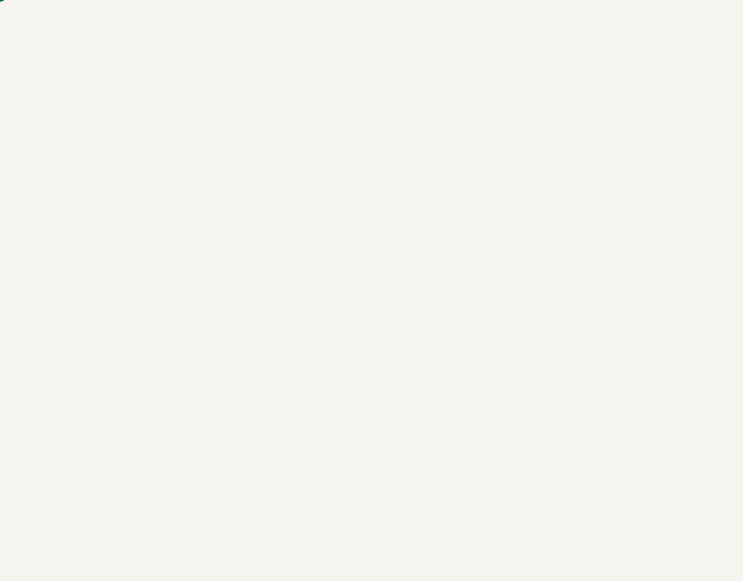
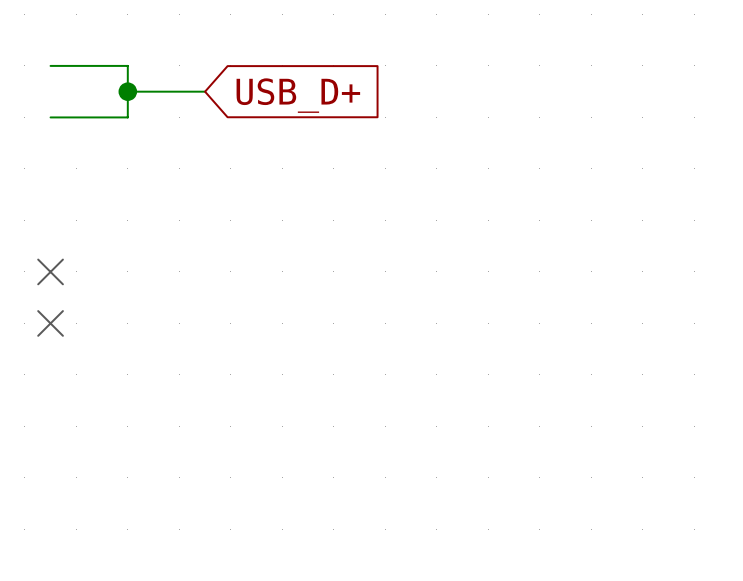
wire: none -> (50, 65) (127, 65) (127, 117) (50, 117)
wire: none -> (127, 91) (205, 91)
junction: none -> (127, 91)
global label: none -> USB_D+ (298, 95)
no-connect mark: none -> (50, 271)
no-connect mark: none -> (50, 323)

